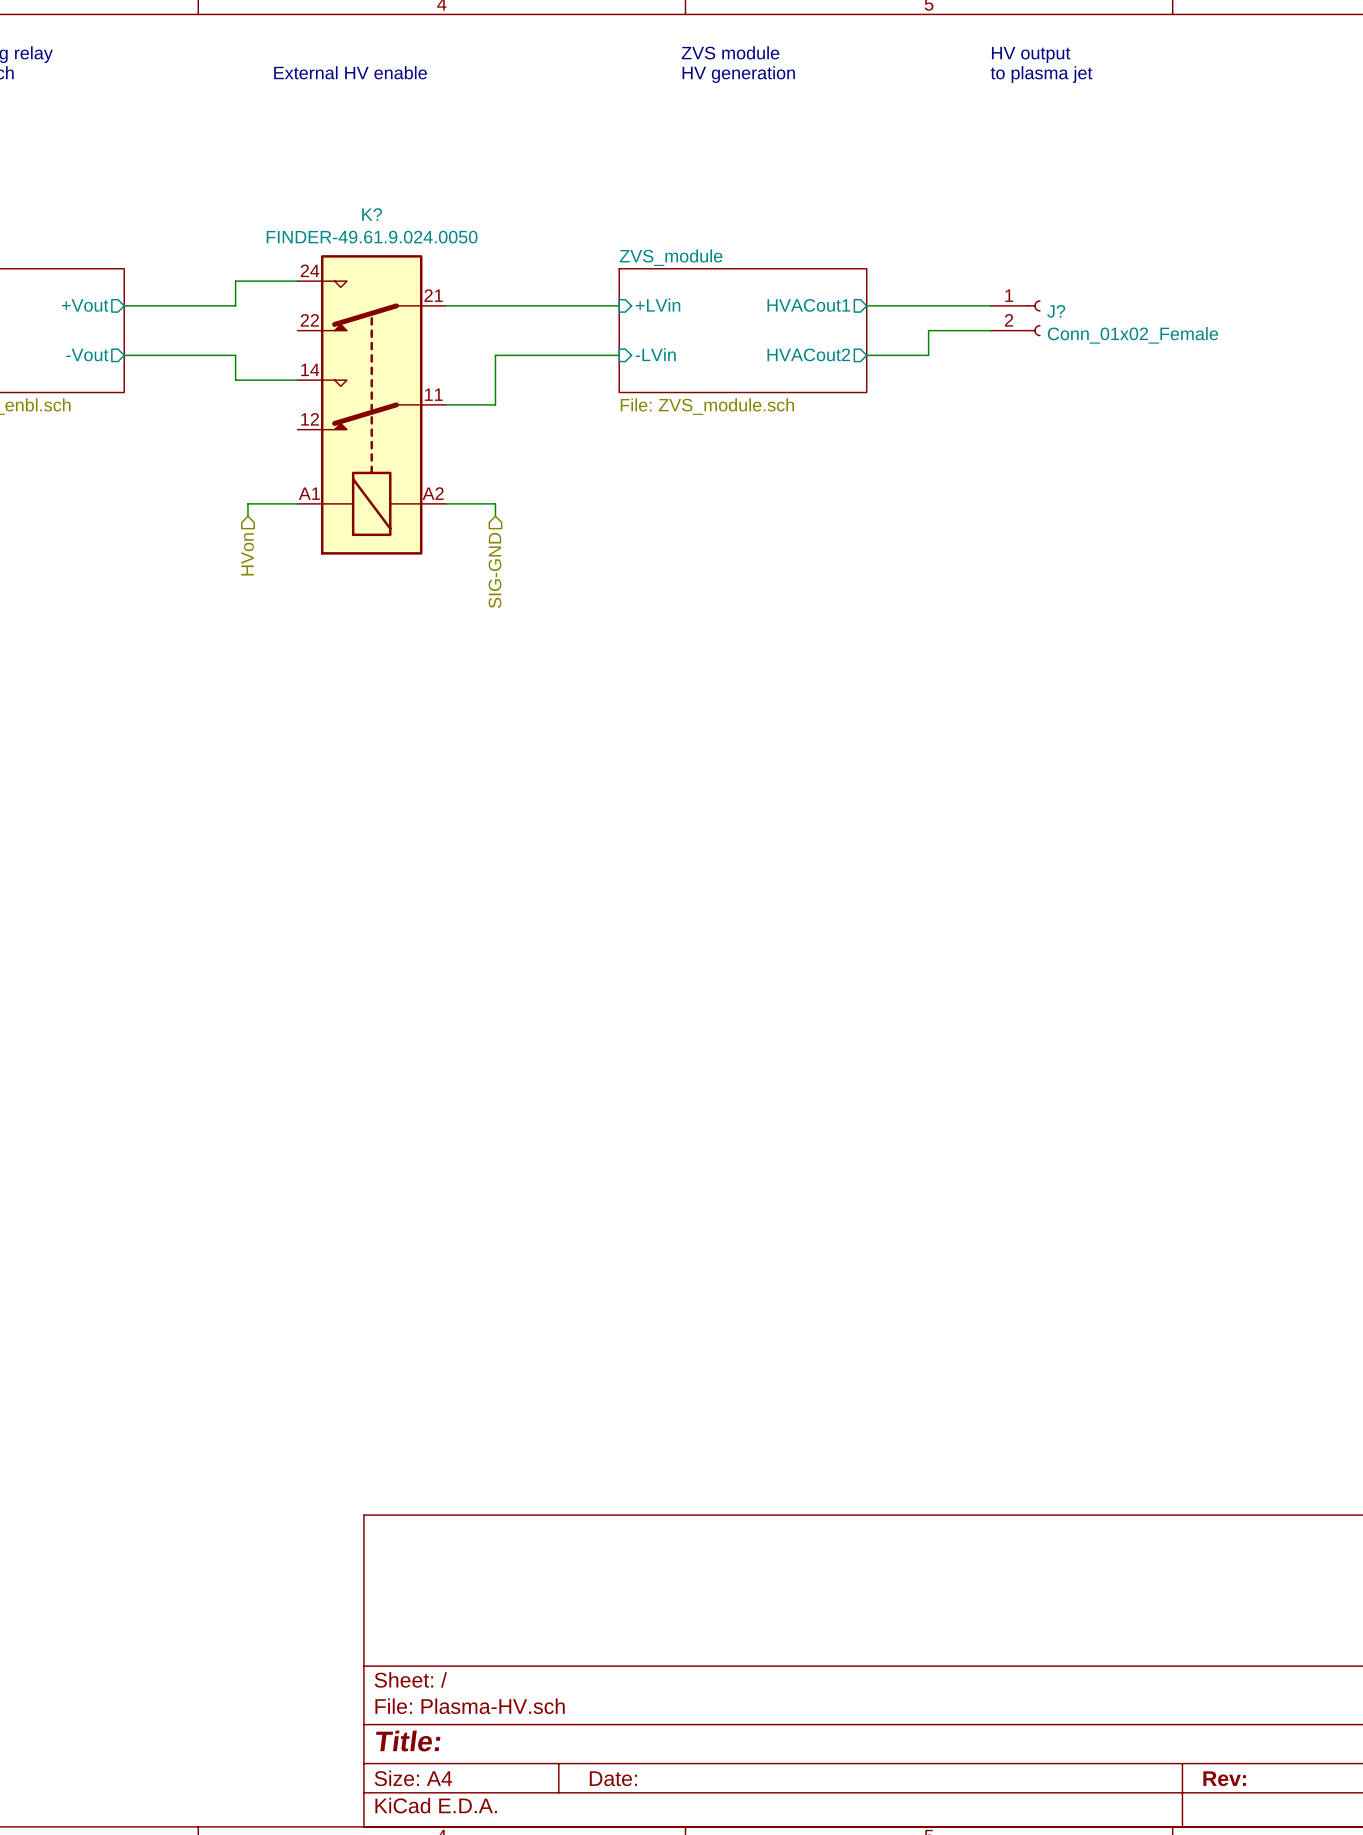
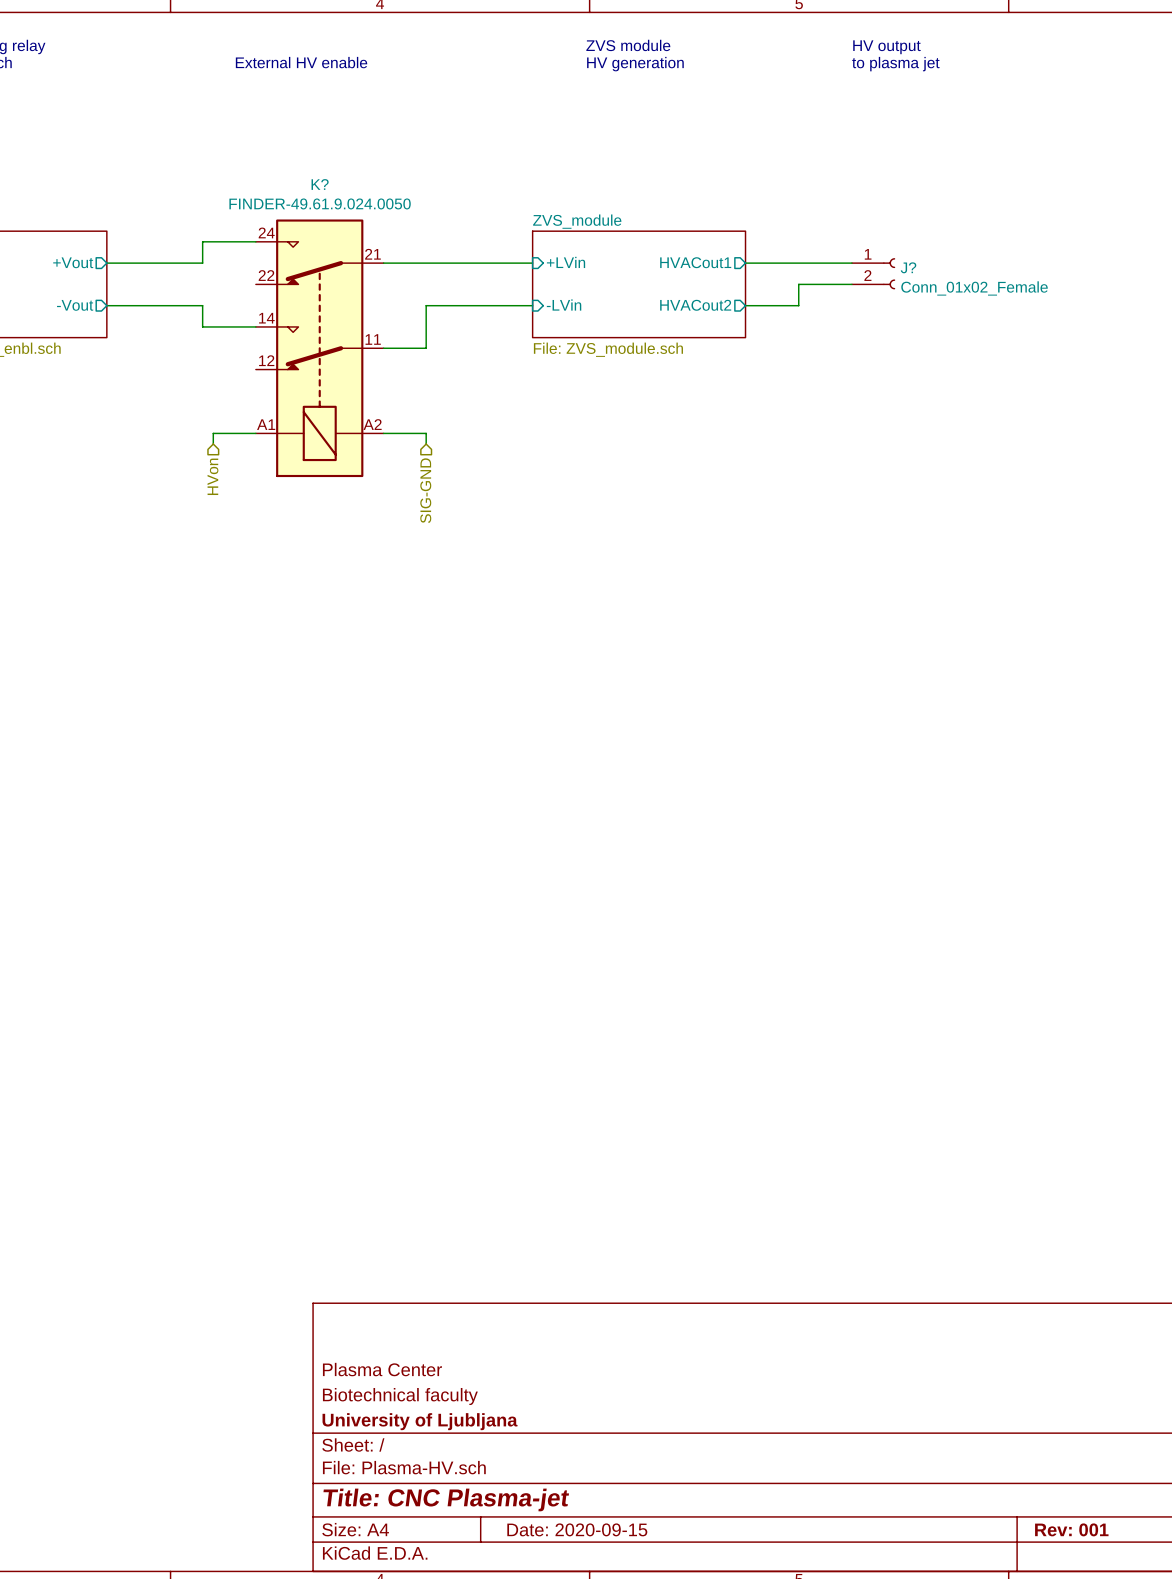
title block: none -> Plasma Center (382, 1369)
title block: none -> Biotechnical faculty (400, 1396)
title block: none -> University of Ljubljana (420, 1421)
title block: Title: (408, 1741) -> Title: CNC Plasma-jet (446, 1499)
title block: Date: (613, 1778) -> Date: 2020-09-15 (577, 1529)
title block: Rev: (1224, 1778) -> Rev: 001 (1071, 1529)

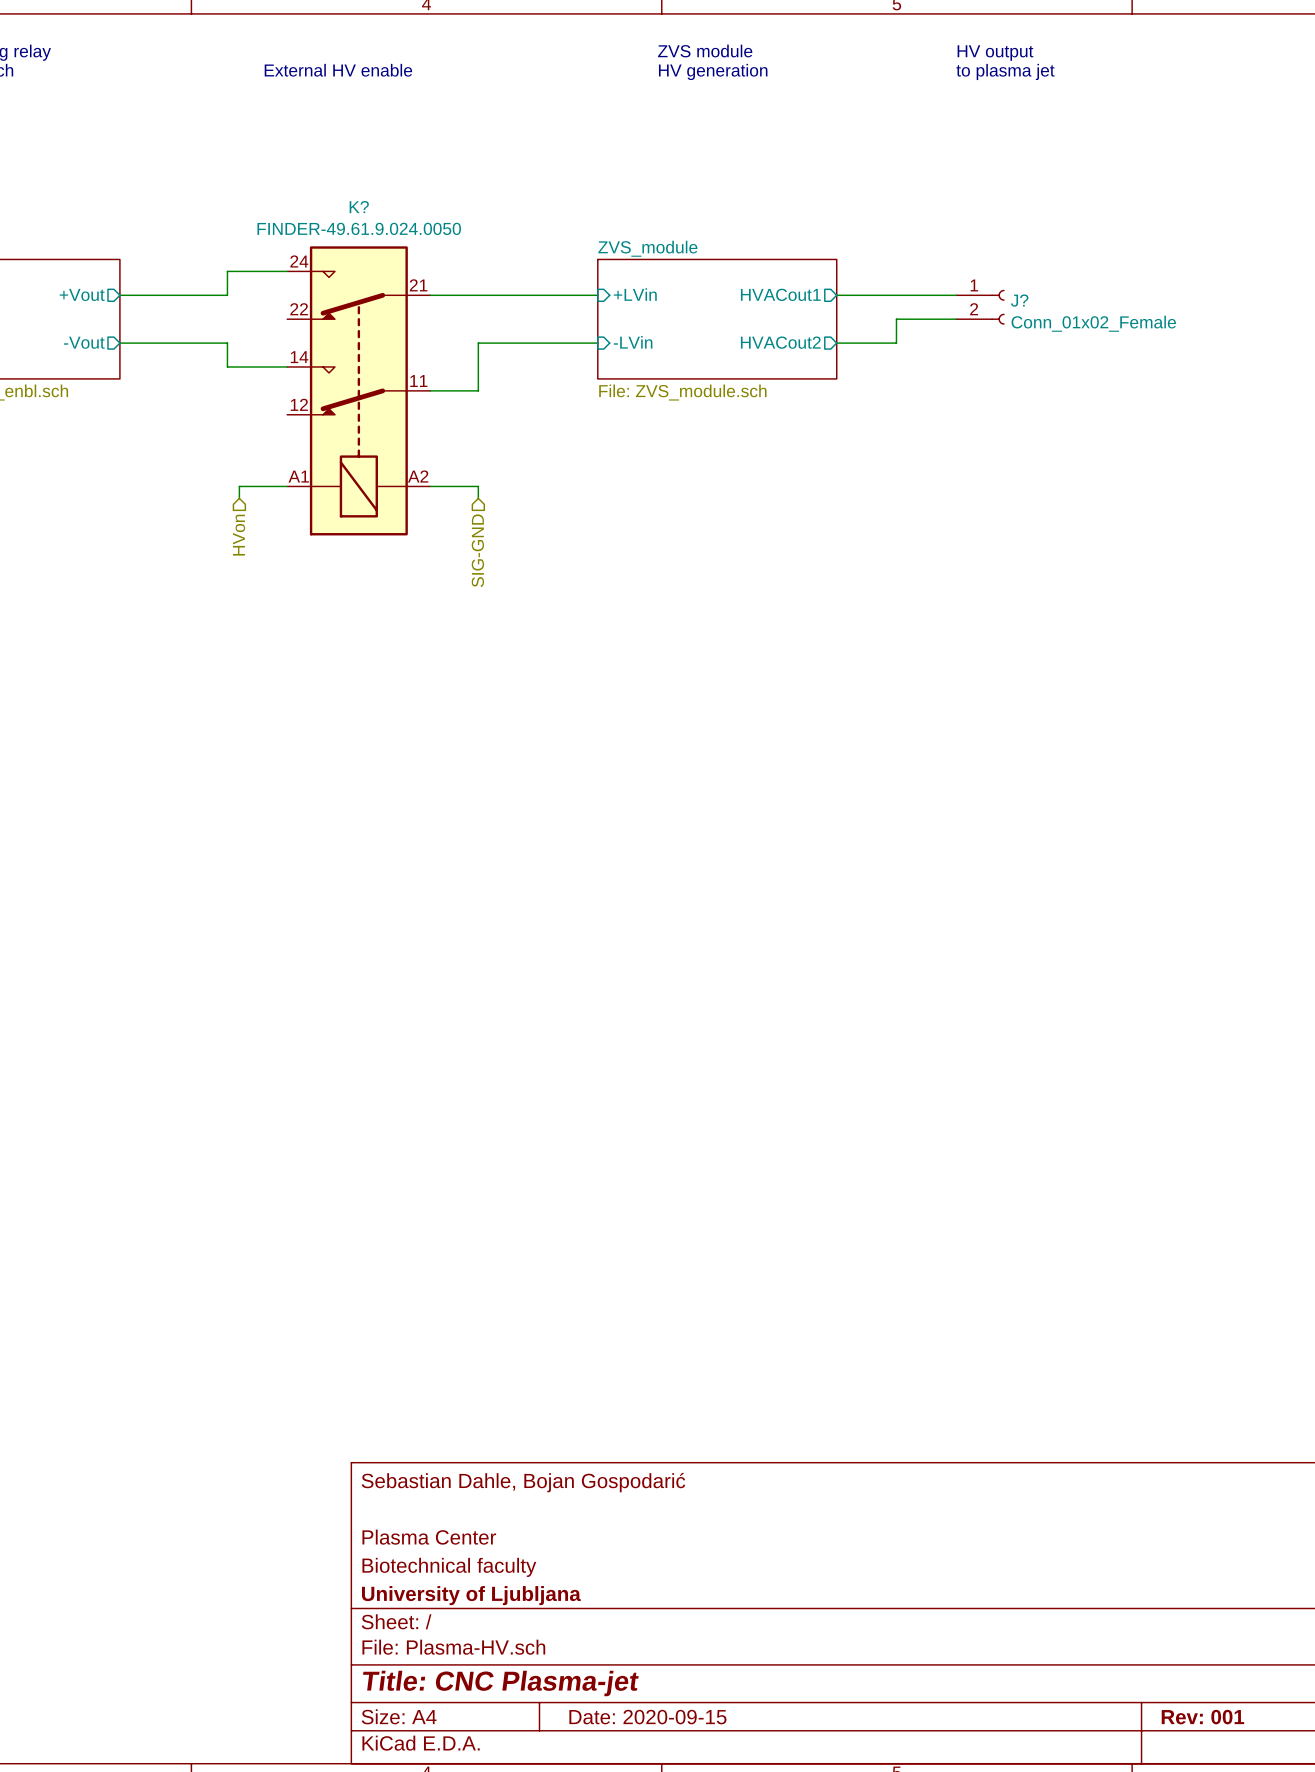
title block: none -> Sebastian Dahle, Bojan Gospodarić (523, 1482)

